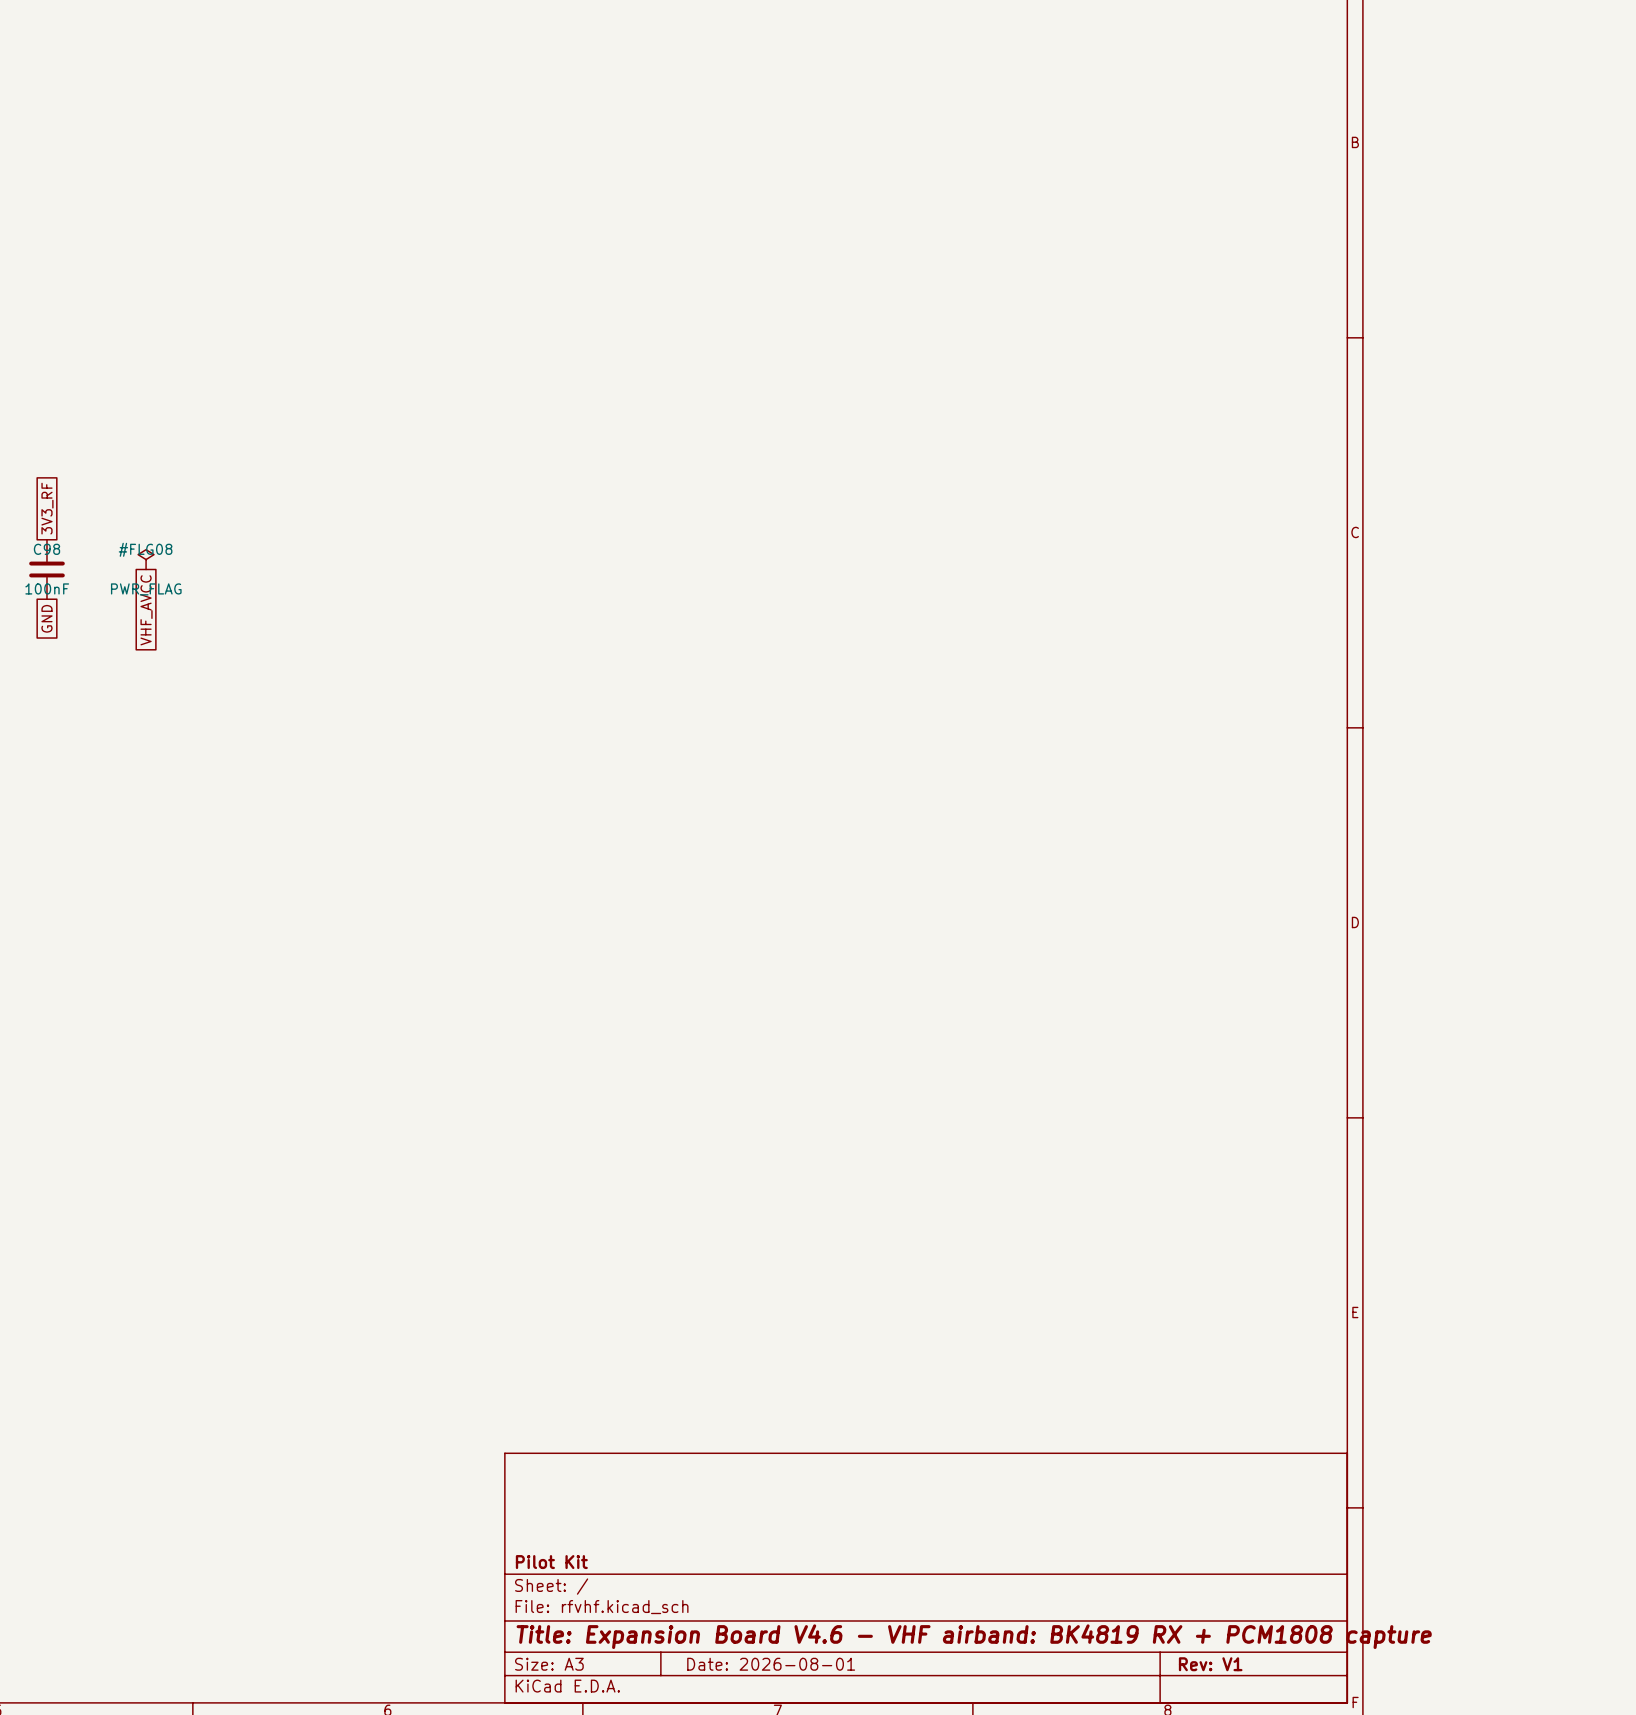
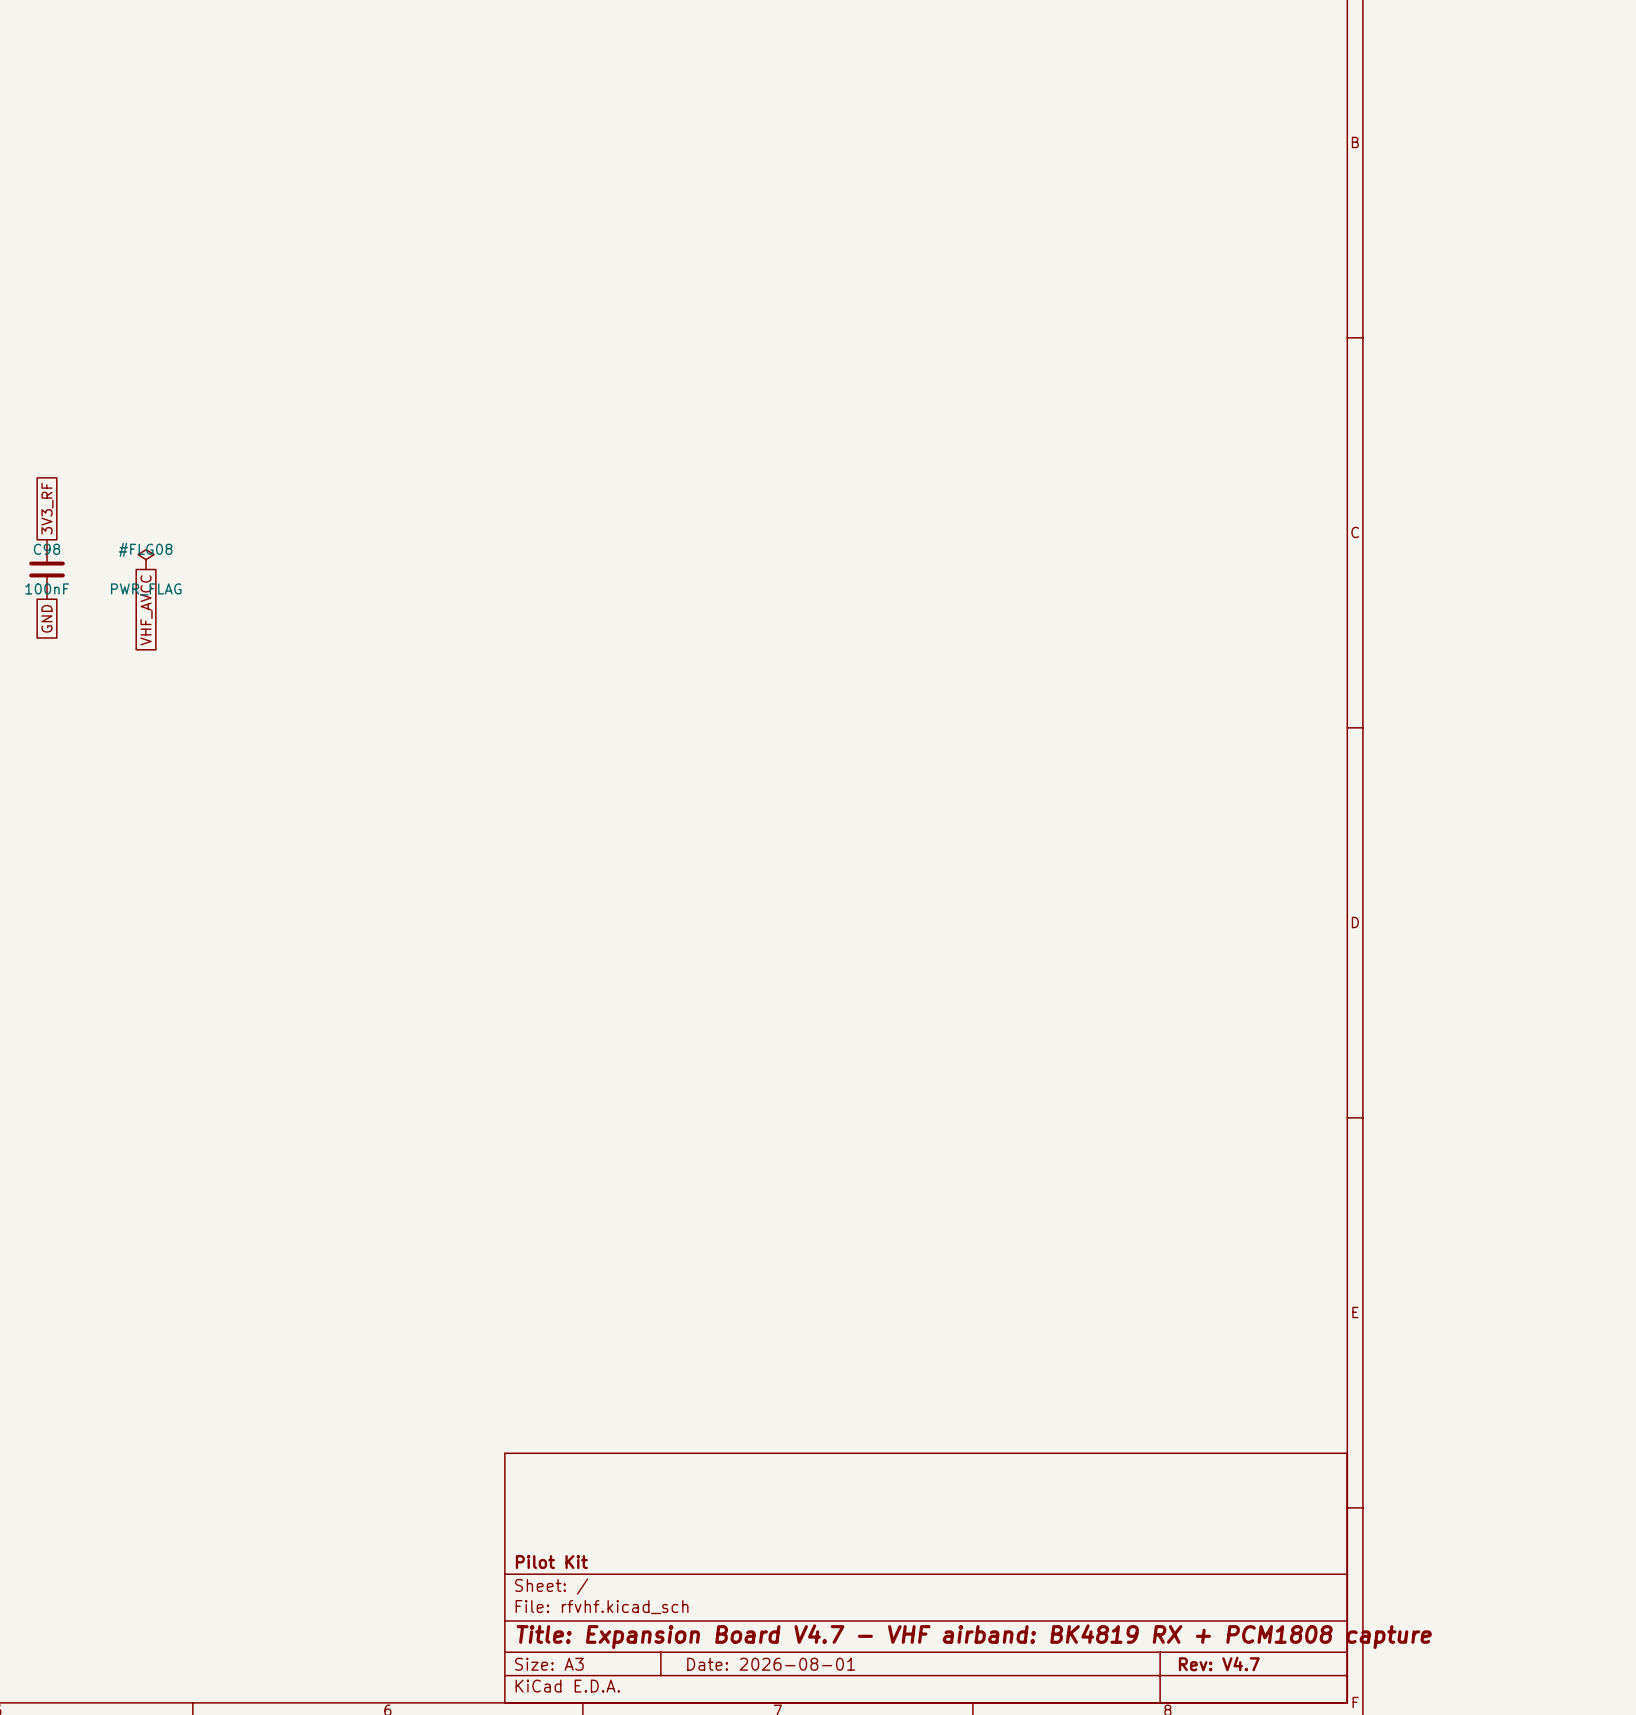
title block: Title: Expansion Board V4.6 - VHF airband: BK4819 RX + PCM1808 capture (974, 1636) -> Title: Expansion Board V4.7 - VHF airband: BK4819 RX + PCM1808 capture (974, 1636)
title block: Rev: V1 (1210, 1664) -> Rev: V4.7 (1219, 1663)

